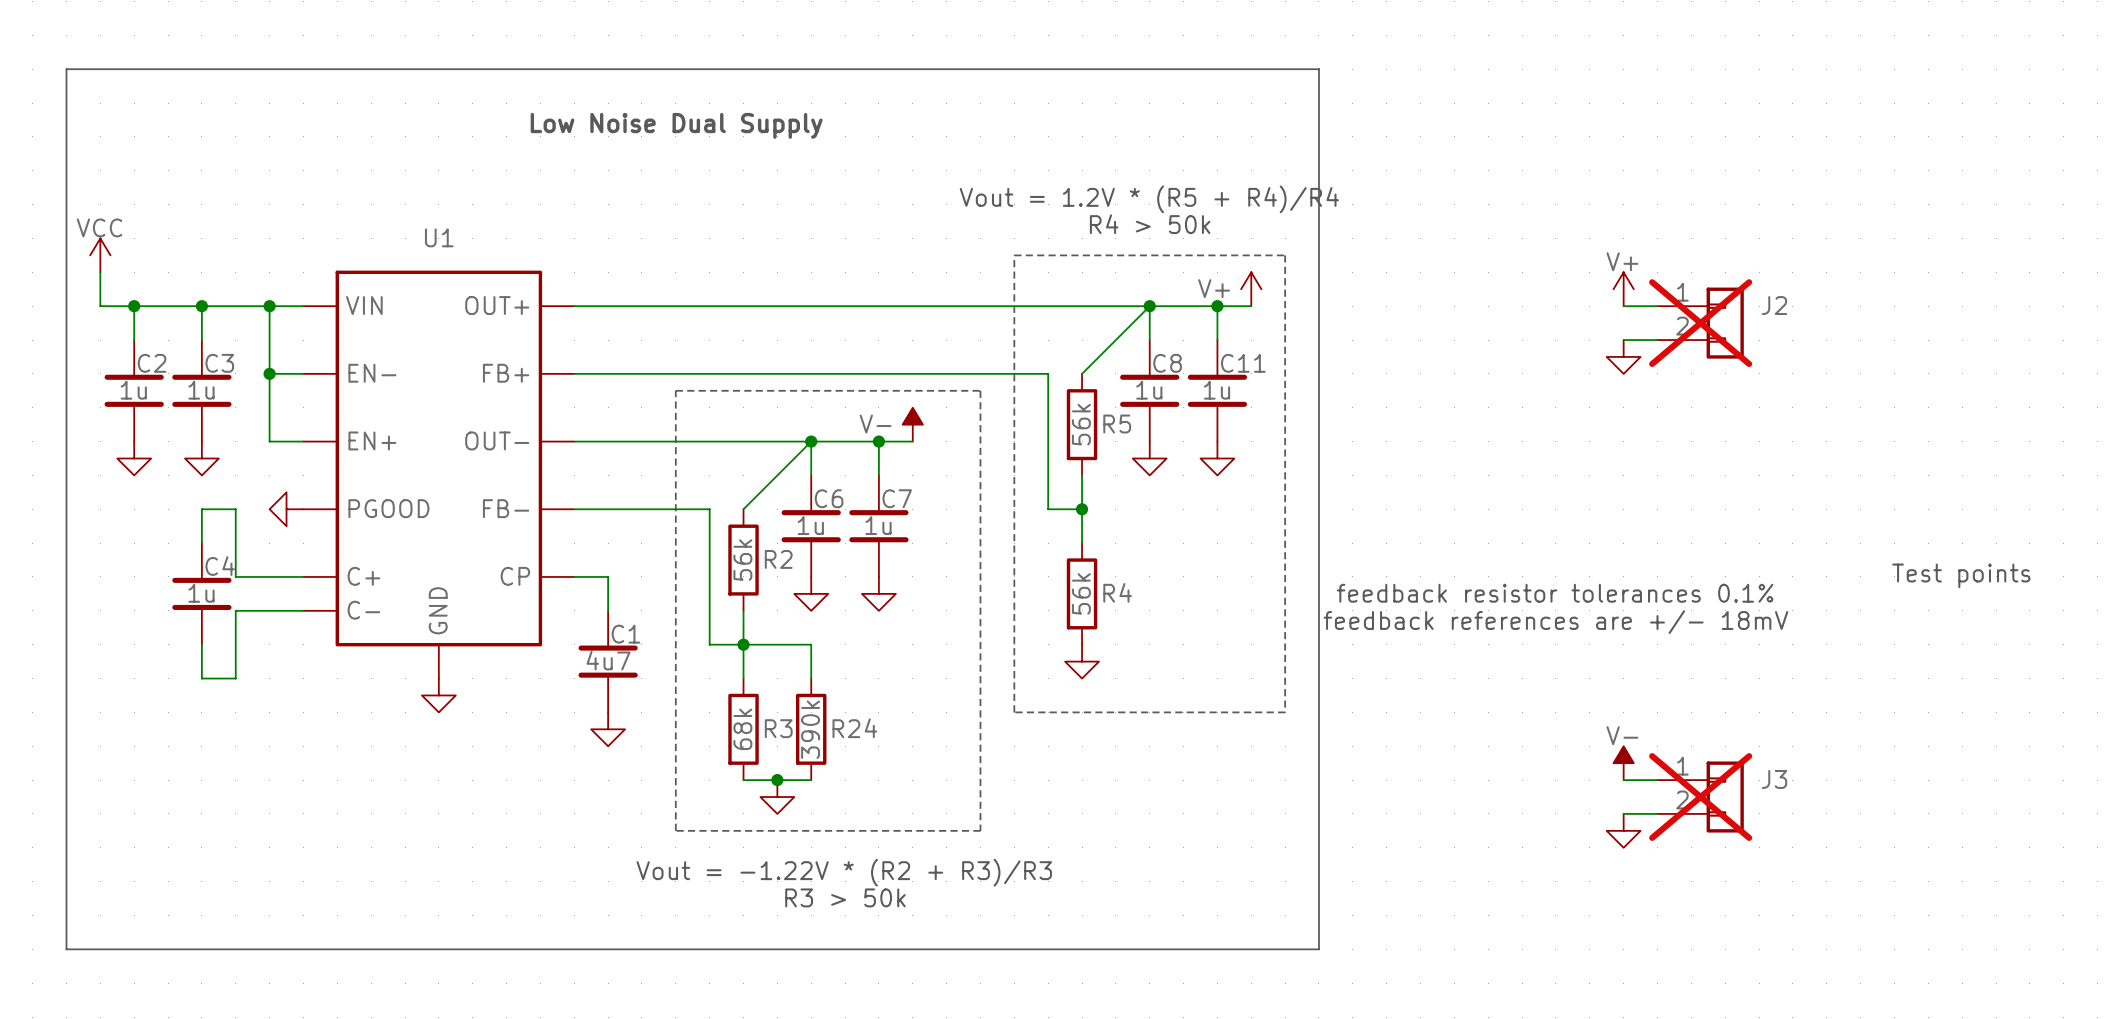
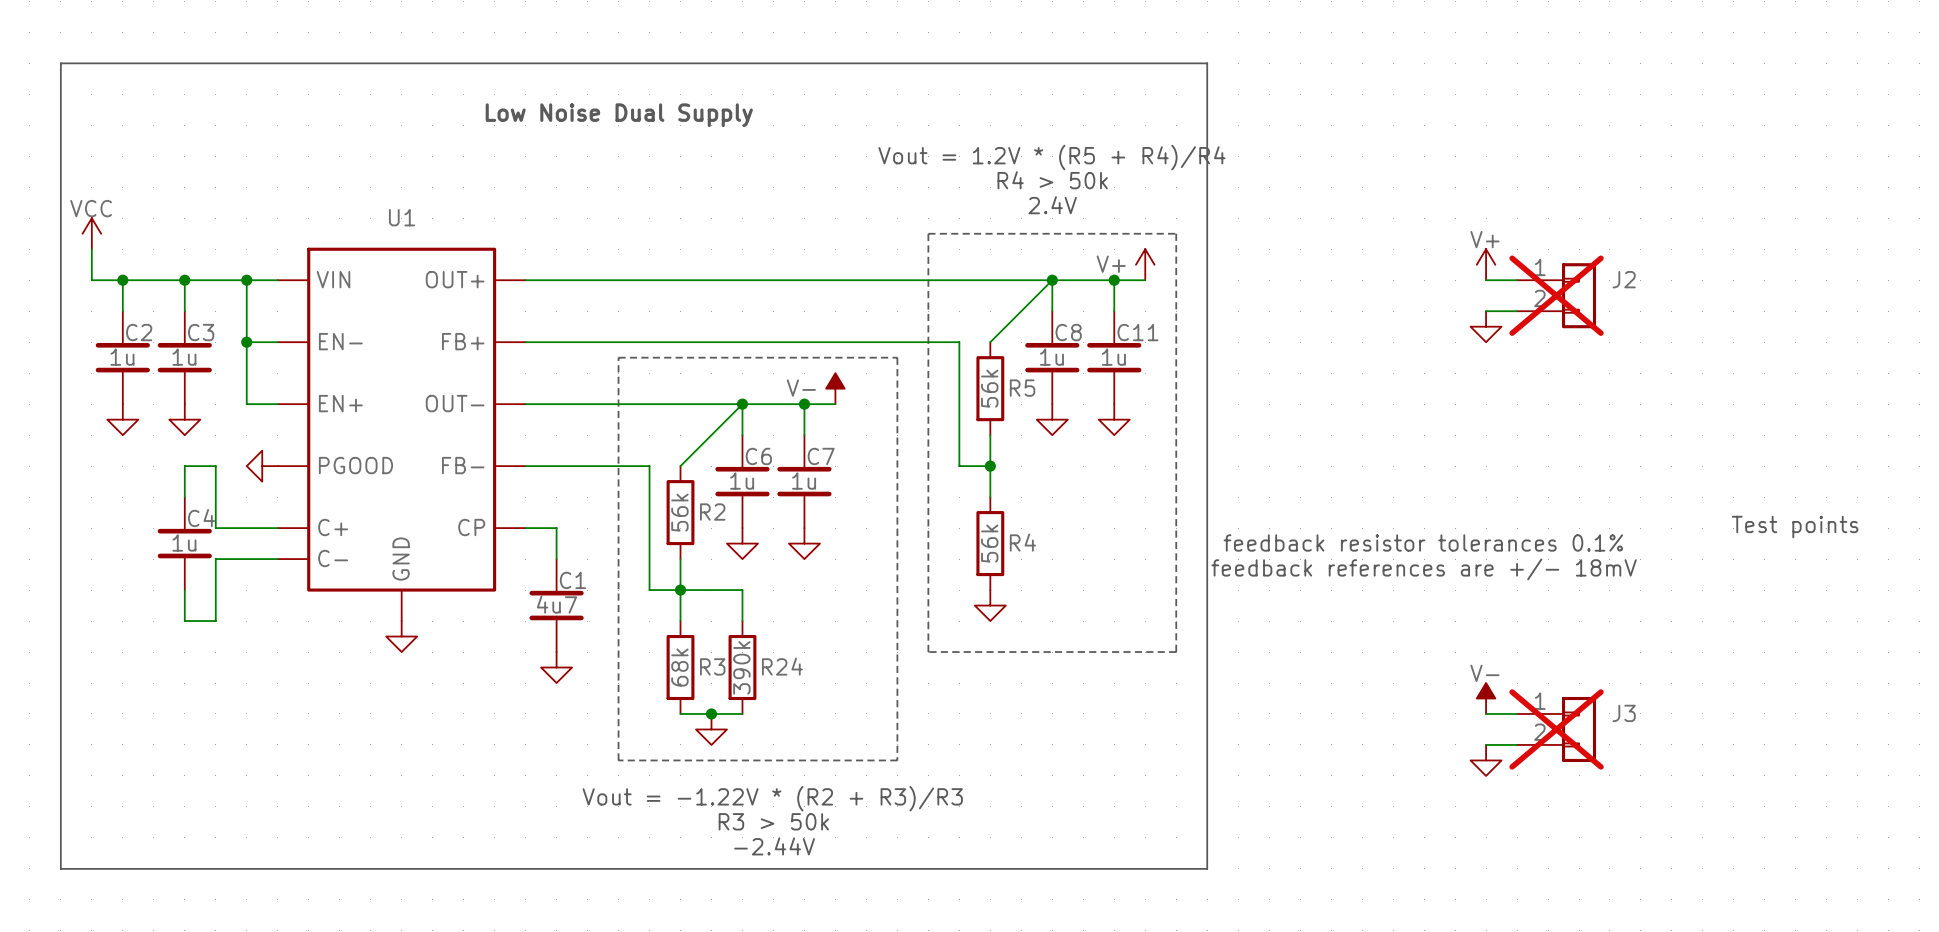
text: none -> Vout = 1.2V * (R5 + R4)/R4 (1051, 157)
text: Vout = 1.2V * (R5 + R4)/R4 (1149, 199) -> R4 > 50k (1052, 180)
text: R4 > 50k (1150, 224) -> 2.4V (1052, 205)
text: none -> -2.44V (774, 846)

